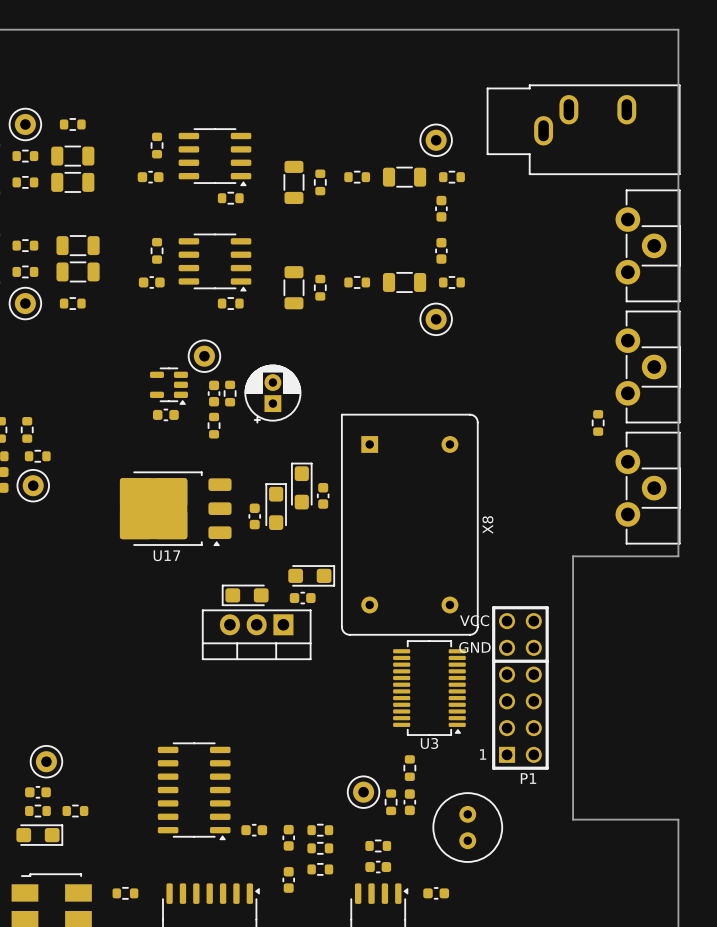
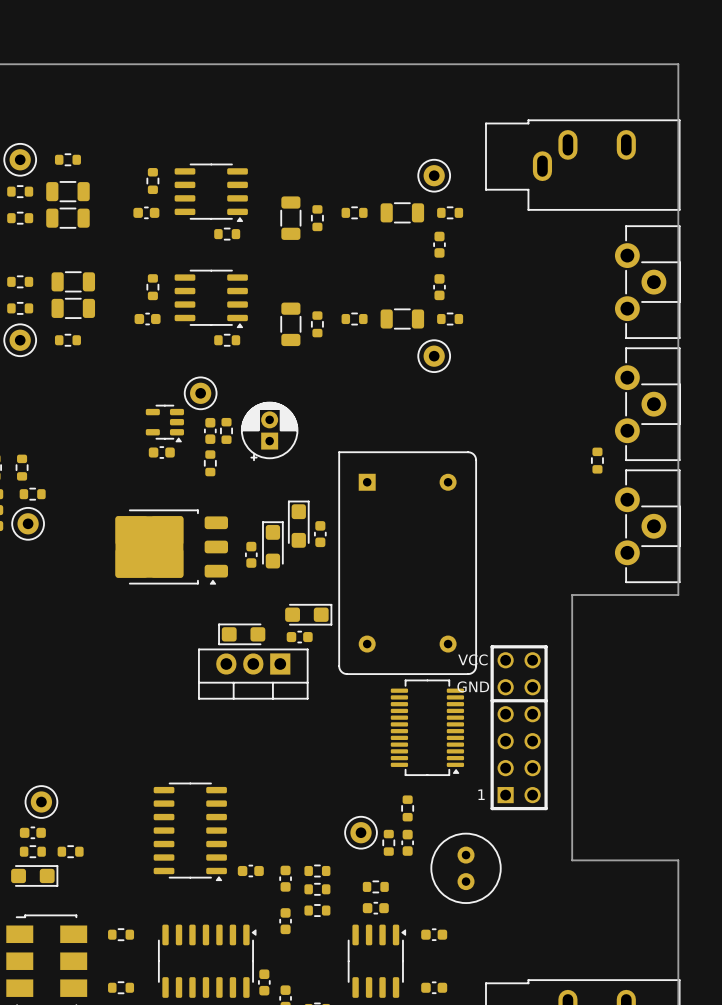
X8 name: X8 (487, 525) -> none
U17 name: U17 (166, 555) -> none
U3 name: U3 (429, 743) -> none
P1 name: P1 (528, 778) -> none

